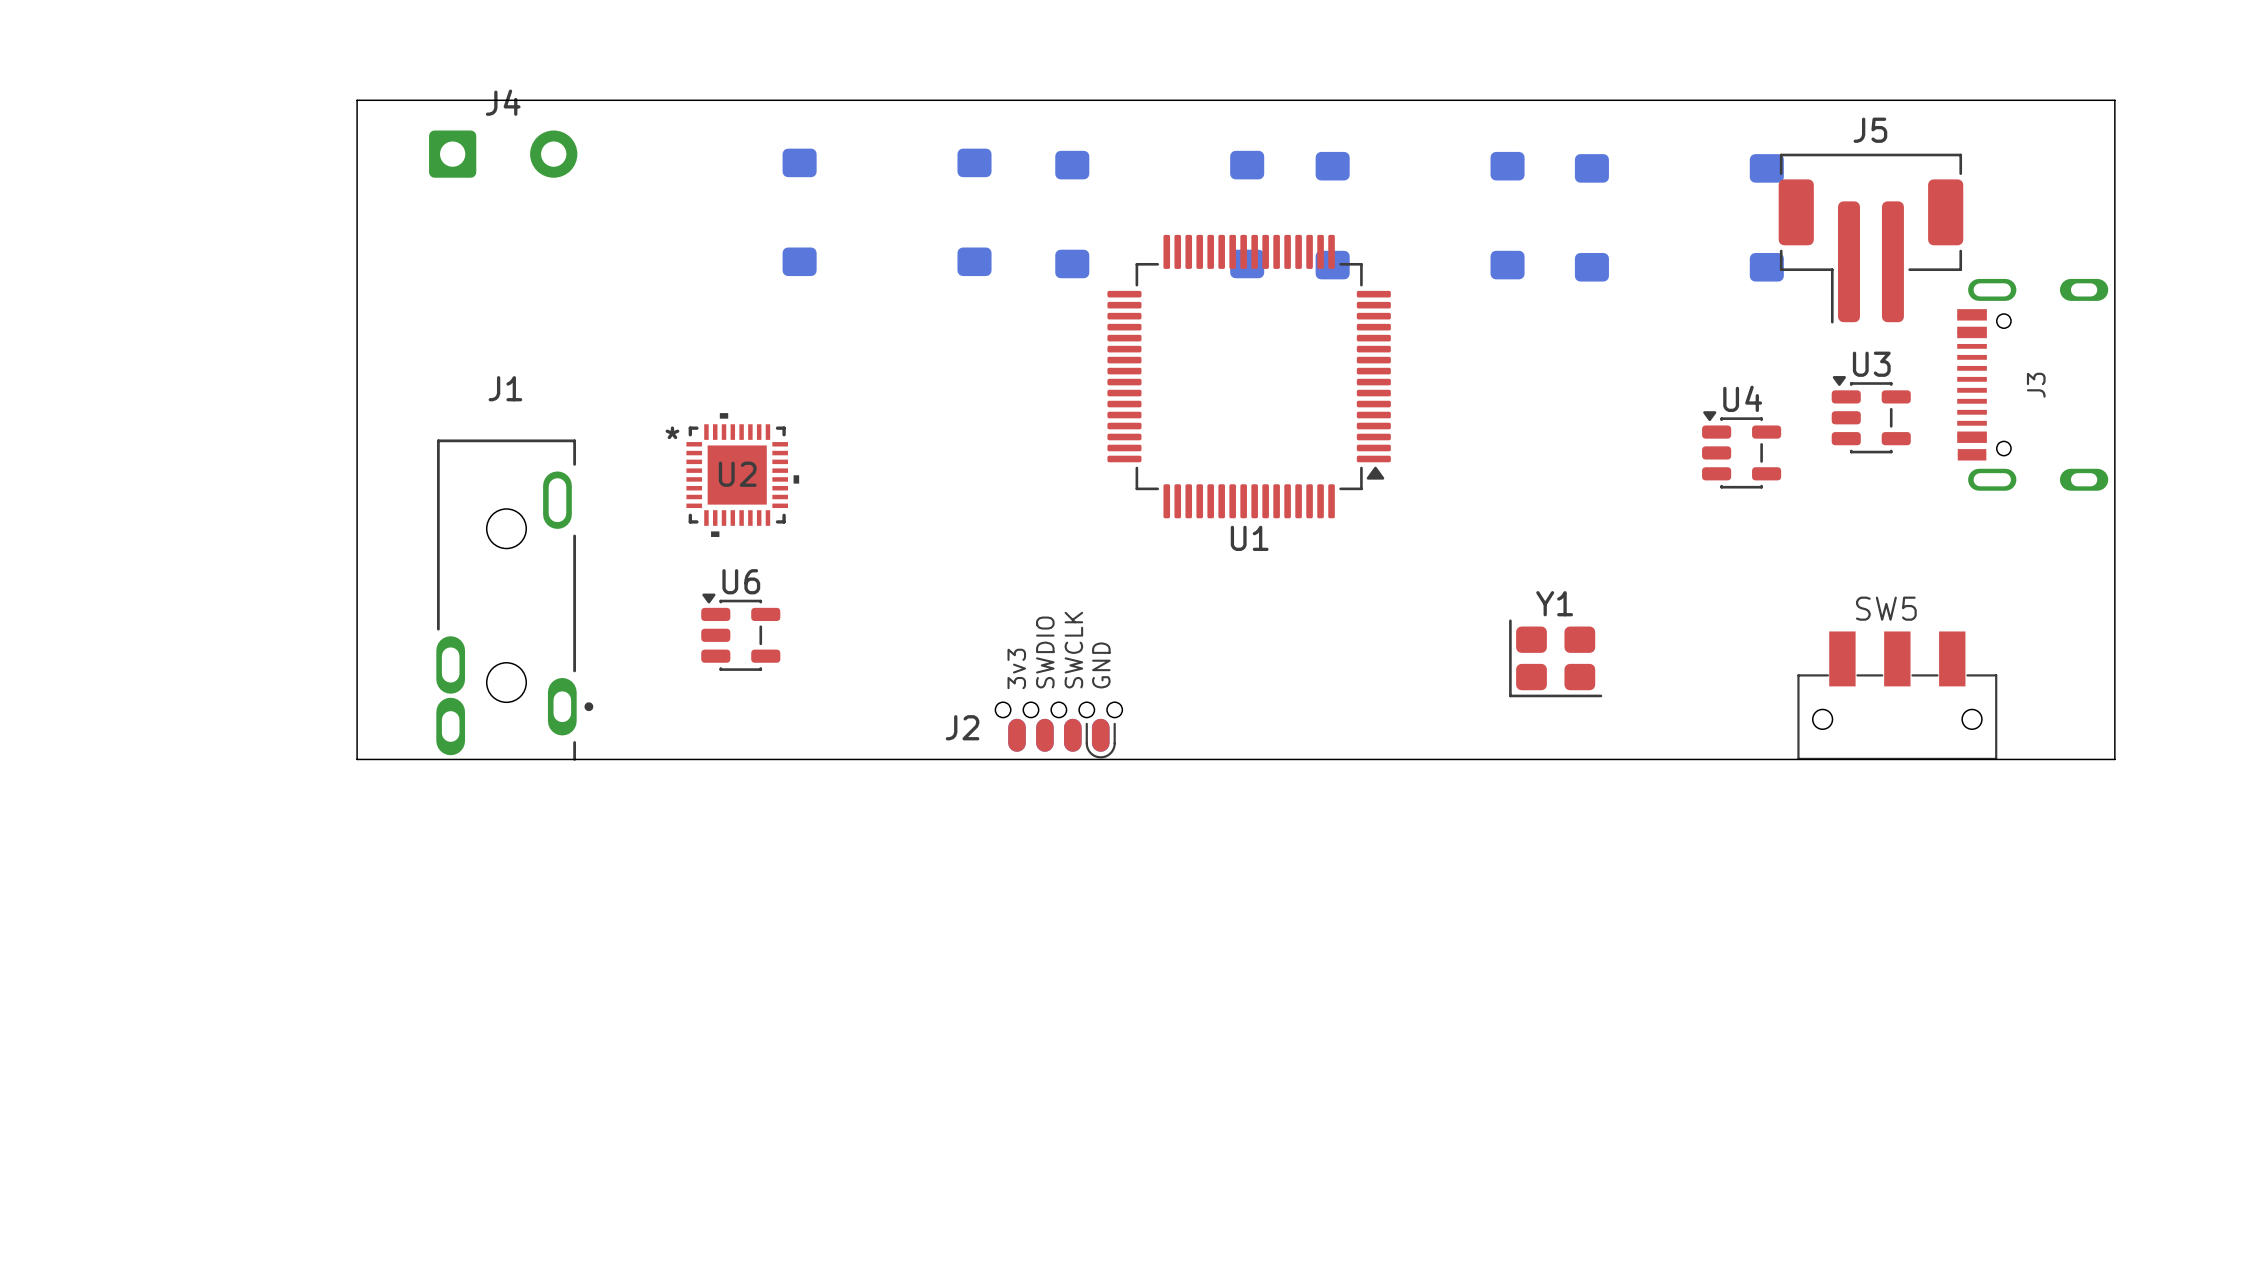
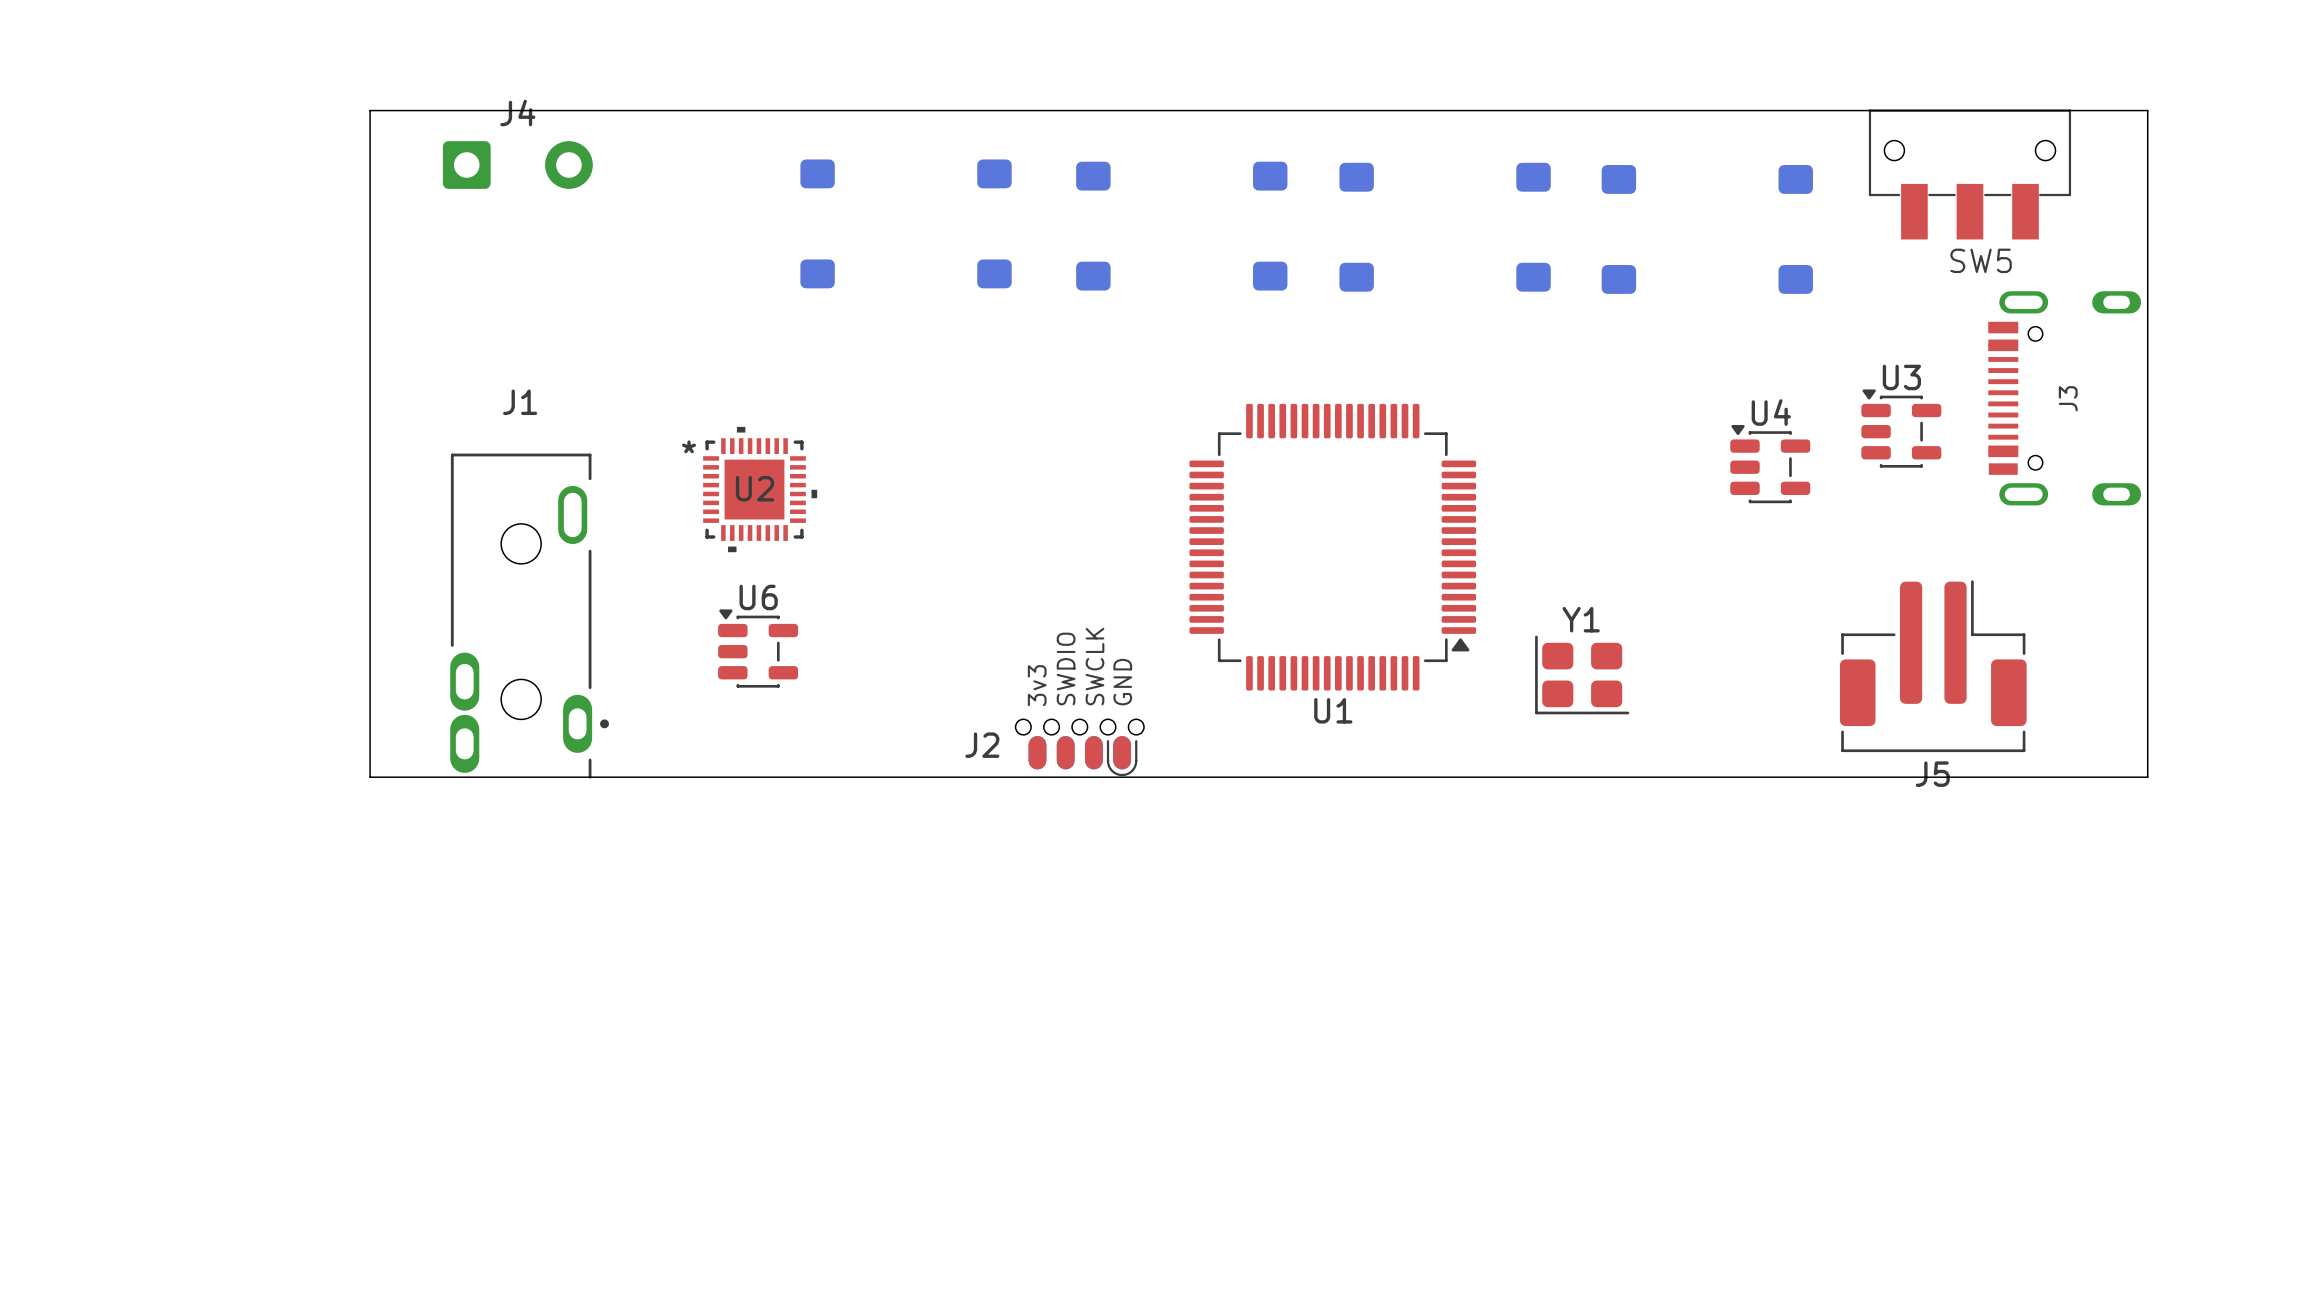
J5 rotation: 0° (1870, 238) -> 180° (1933, 666)
J5 position: (1870, 238) -> (1933, 666)
U1 position: (1249, 376) -> (1332, 547)
SW5 rotation: 0° (1897, 695) -> 180° (1969, 174)
SW5 position: (1897, 695) -> (1969, 174)

